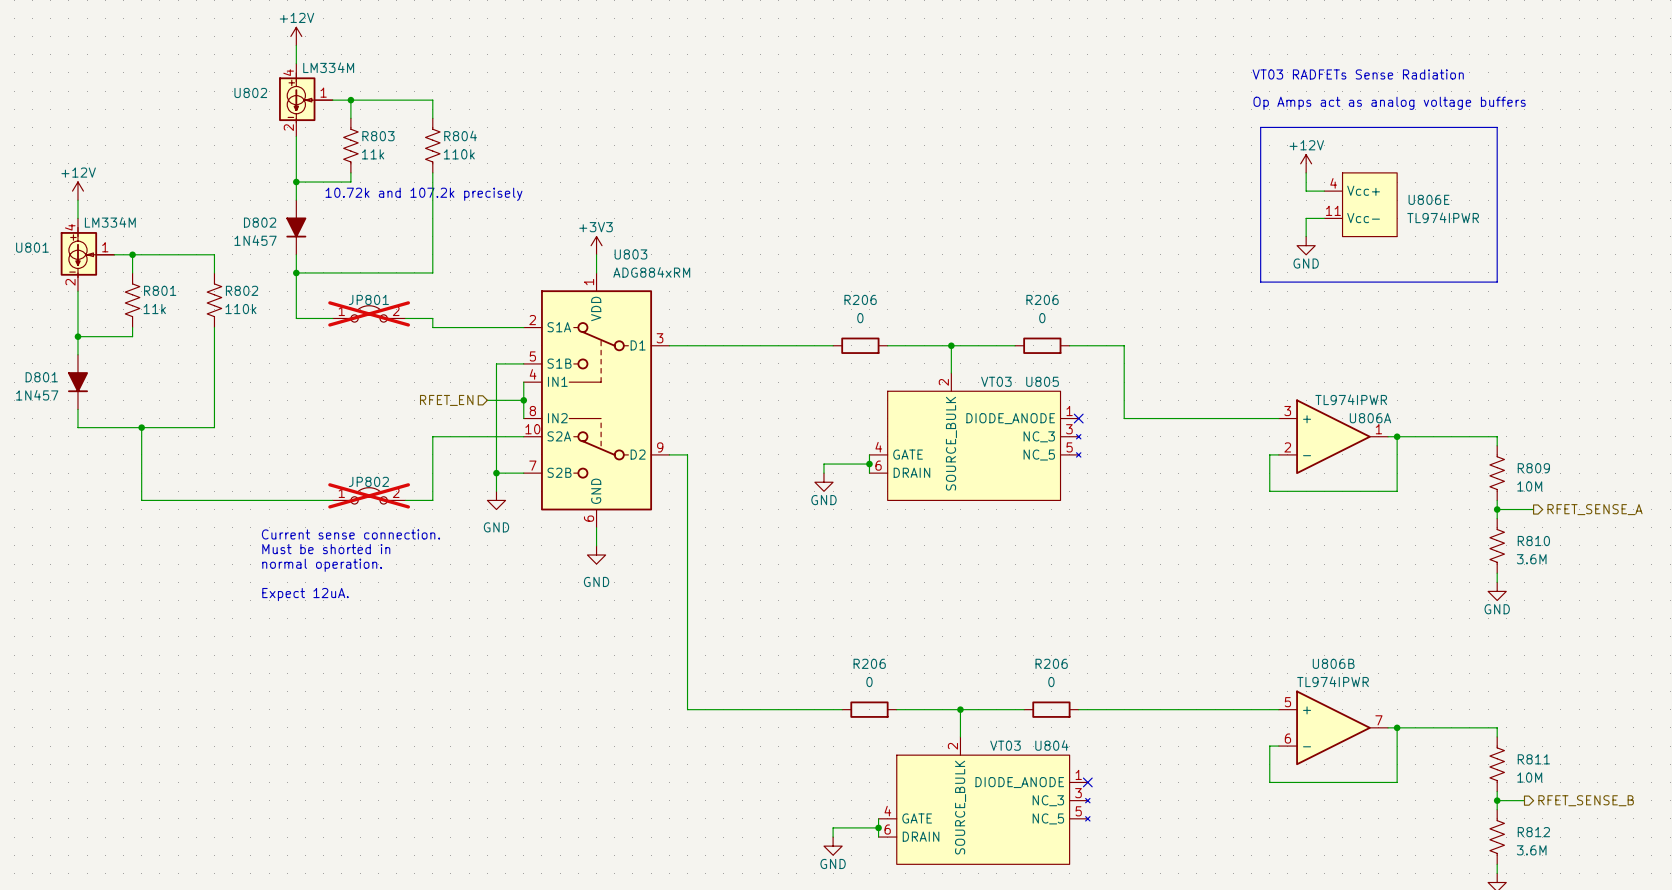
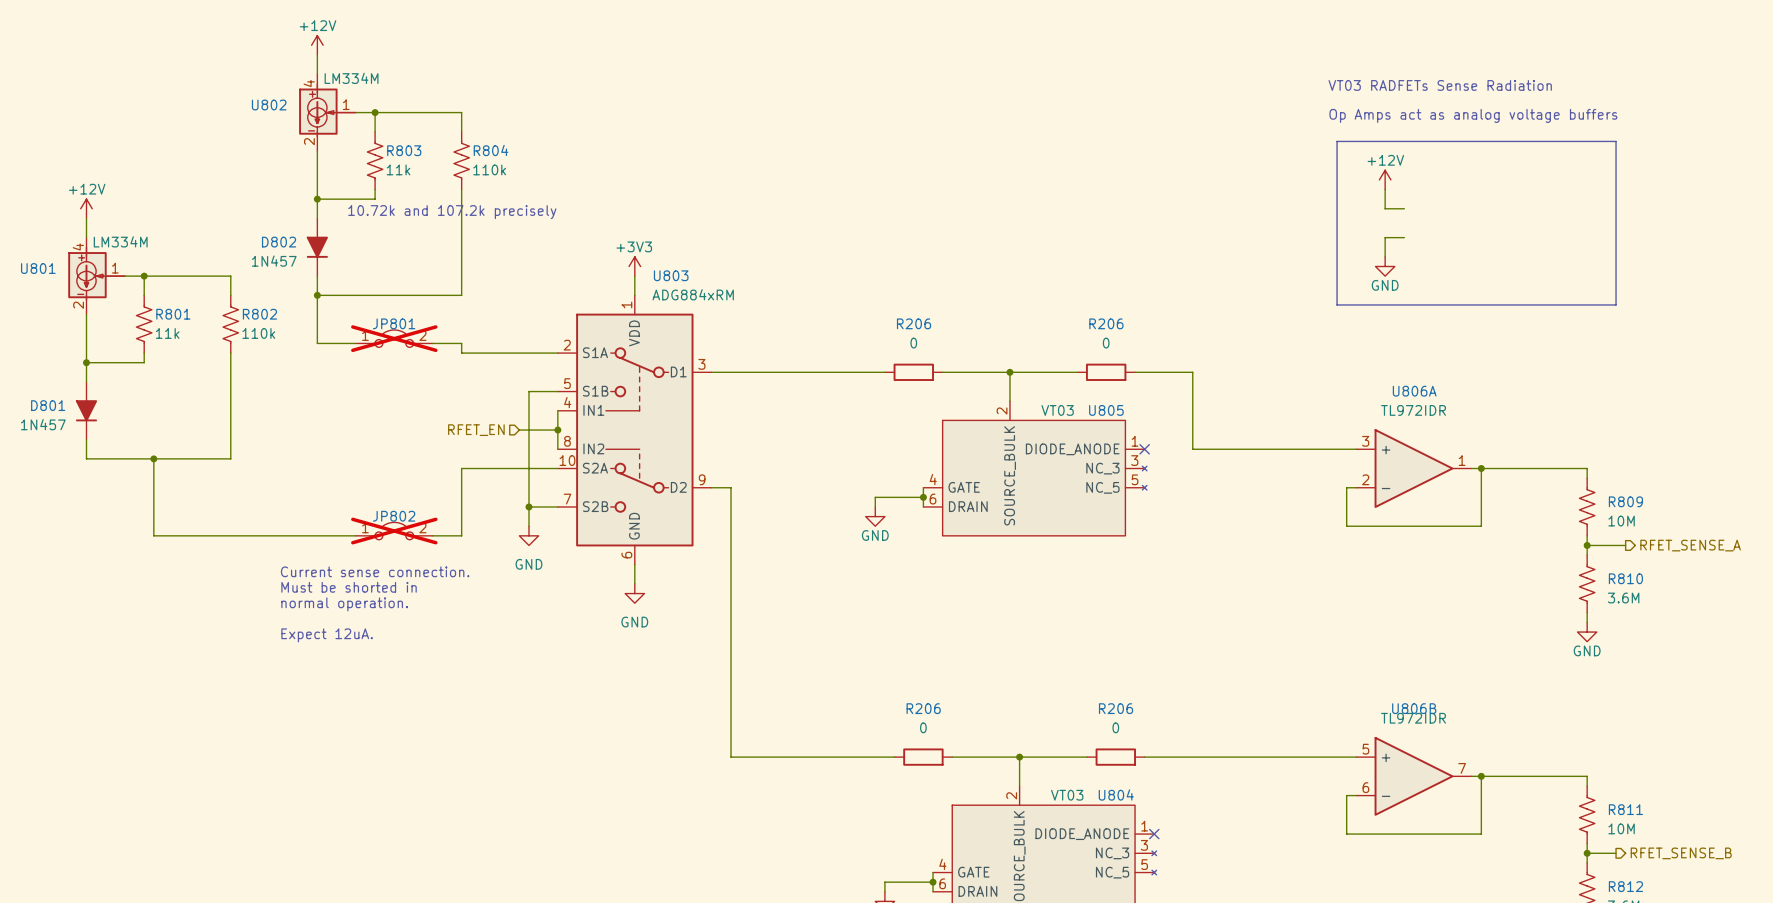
line: (1497, 127) (1497, 282) -> (1587, 141) (1616, 141) (1616, 304) (1587, 304)
U806E: TL974IPWR (1360, 204) -> none
U806A value: TL974IPWR (1351, 399) -> TL972IDR (1413, 410)
U806A name position: U806A (1370, 418) -> U806A (1414, 391)
U806B value: TL974IPWR (1333, 681) -> TL972IDR (1413, 718)

